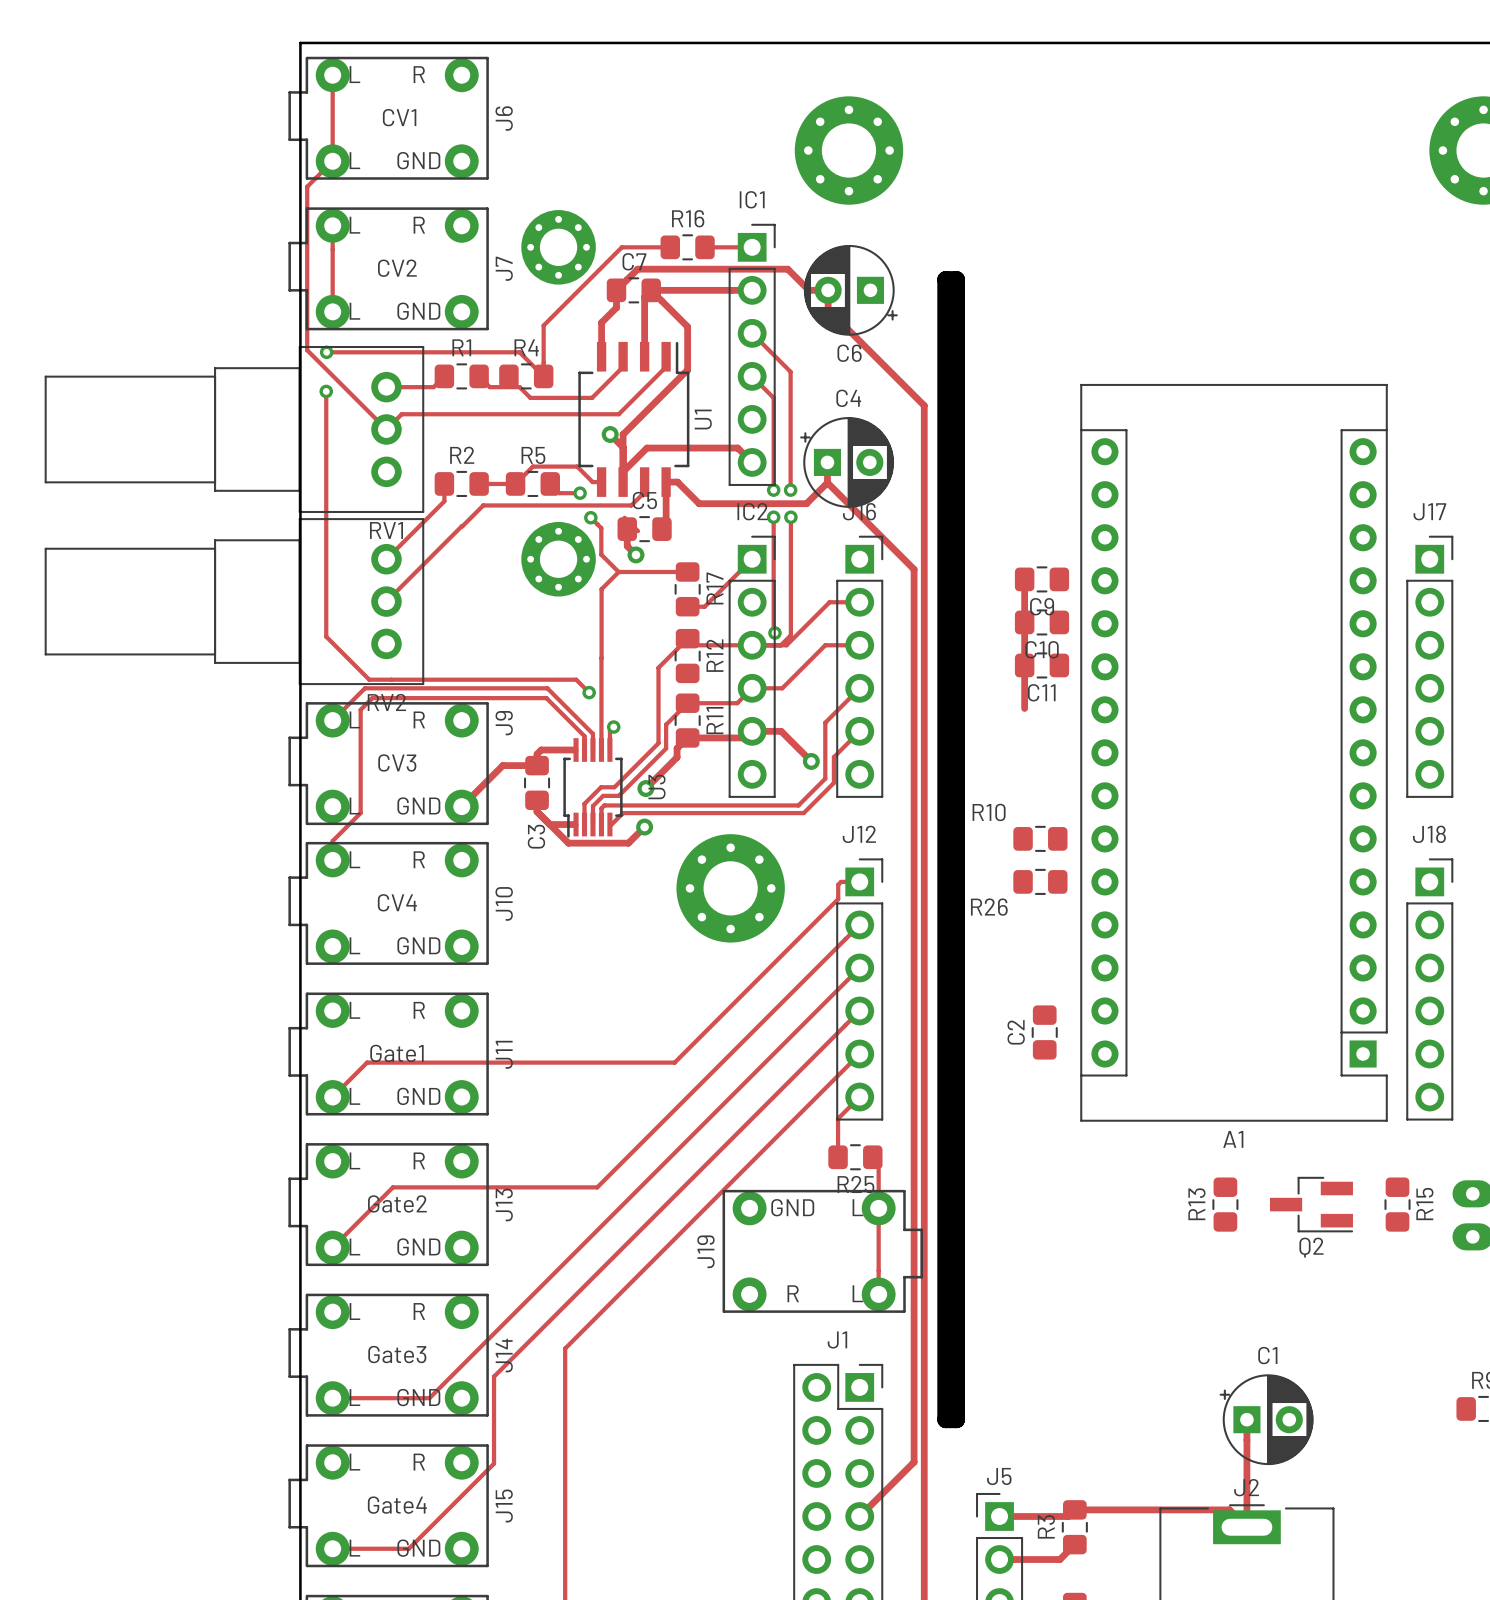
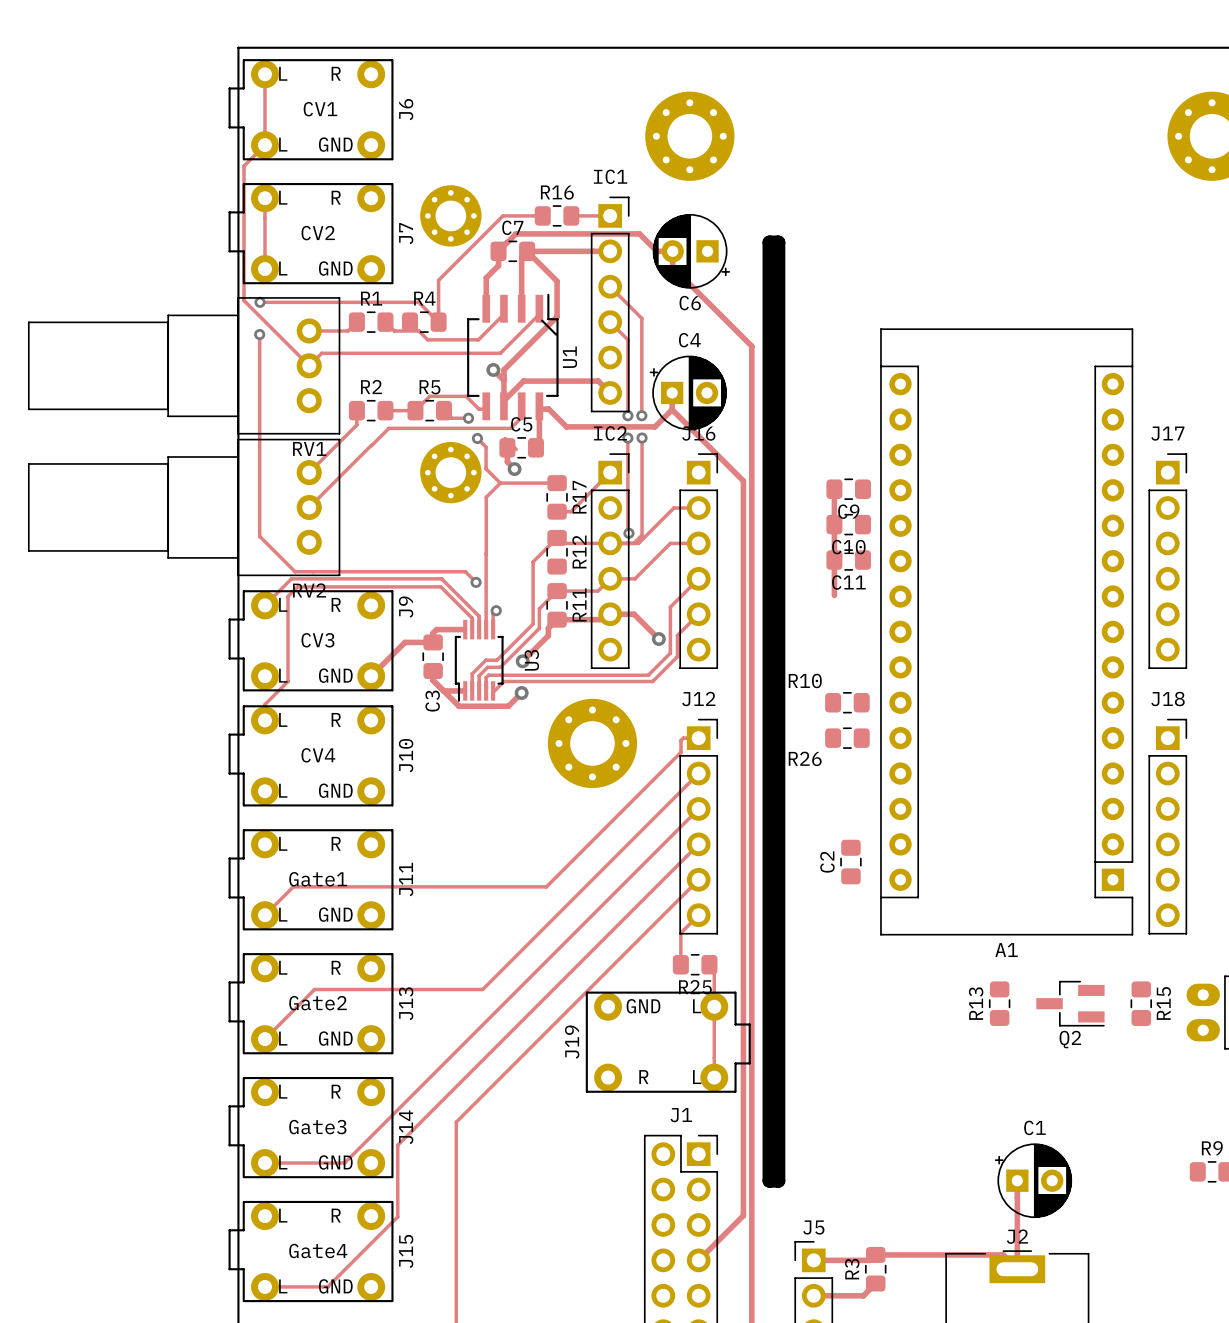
U1 footprint: [578, 341, 690, 497] -> [467, 293, 559, 421]

